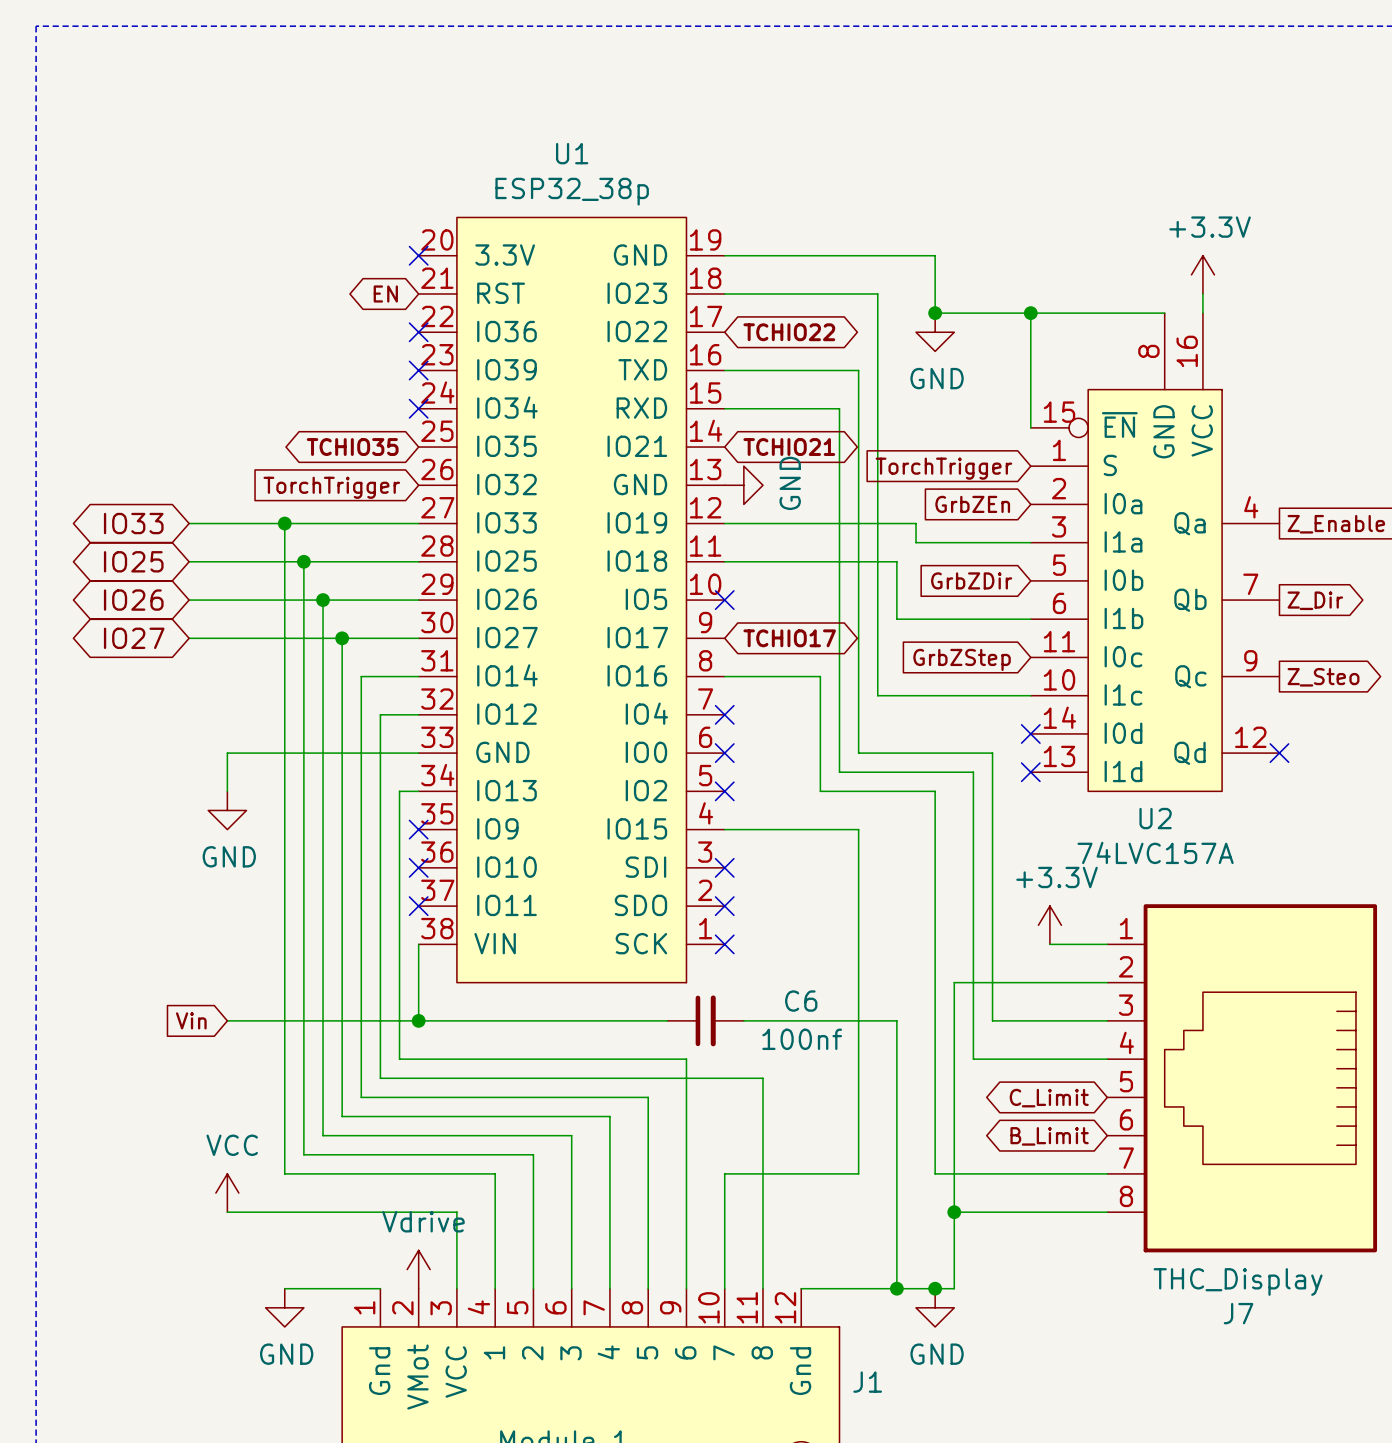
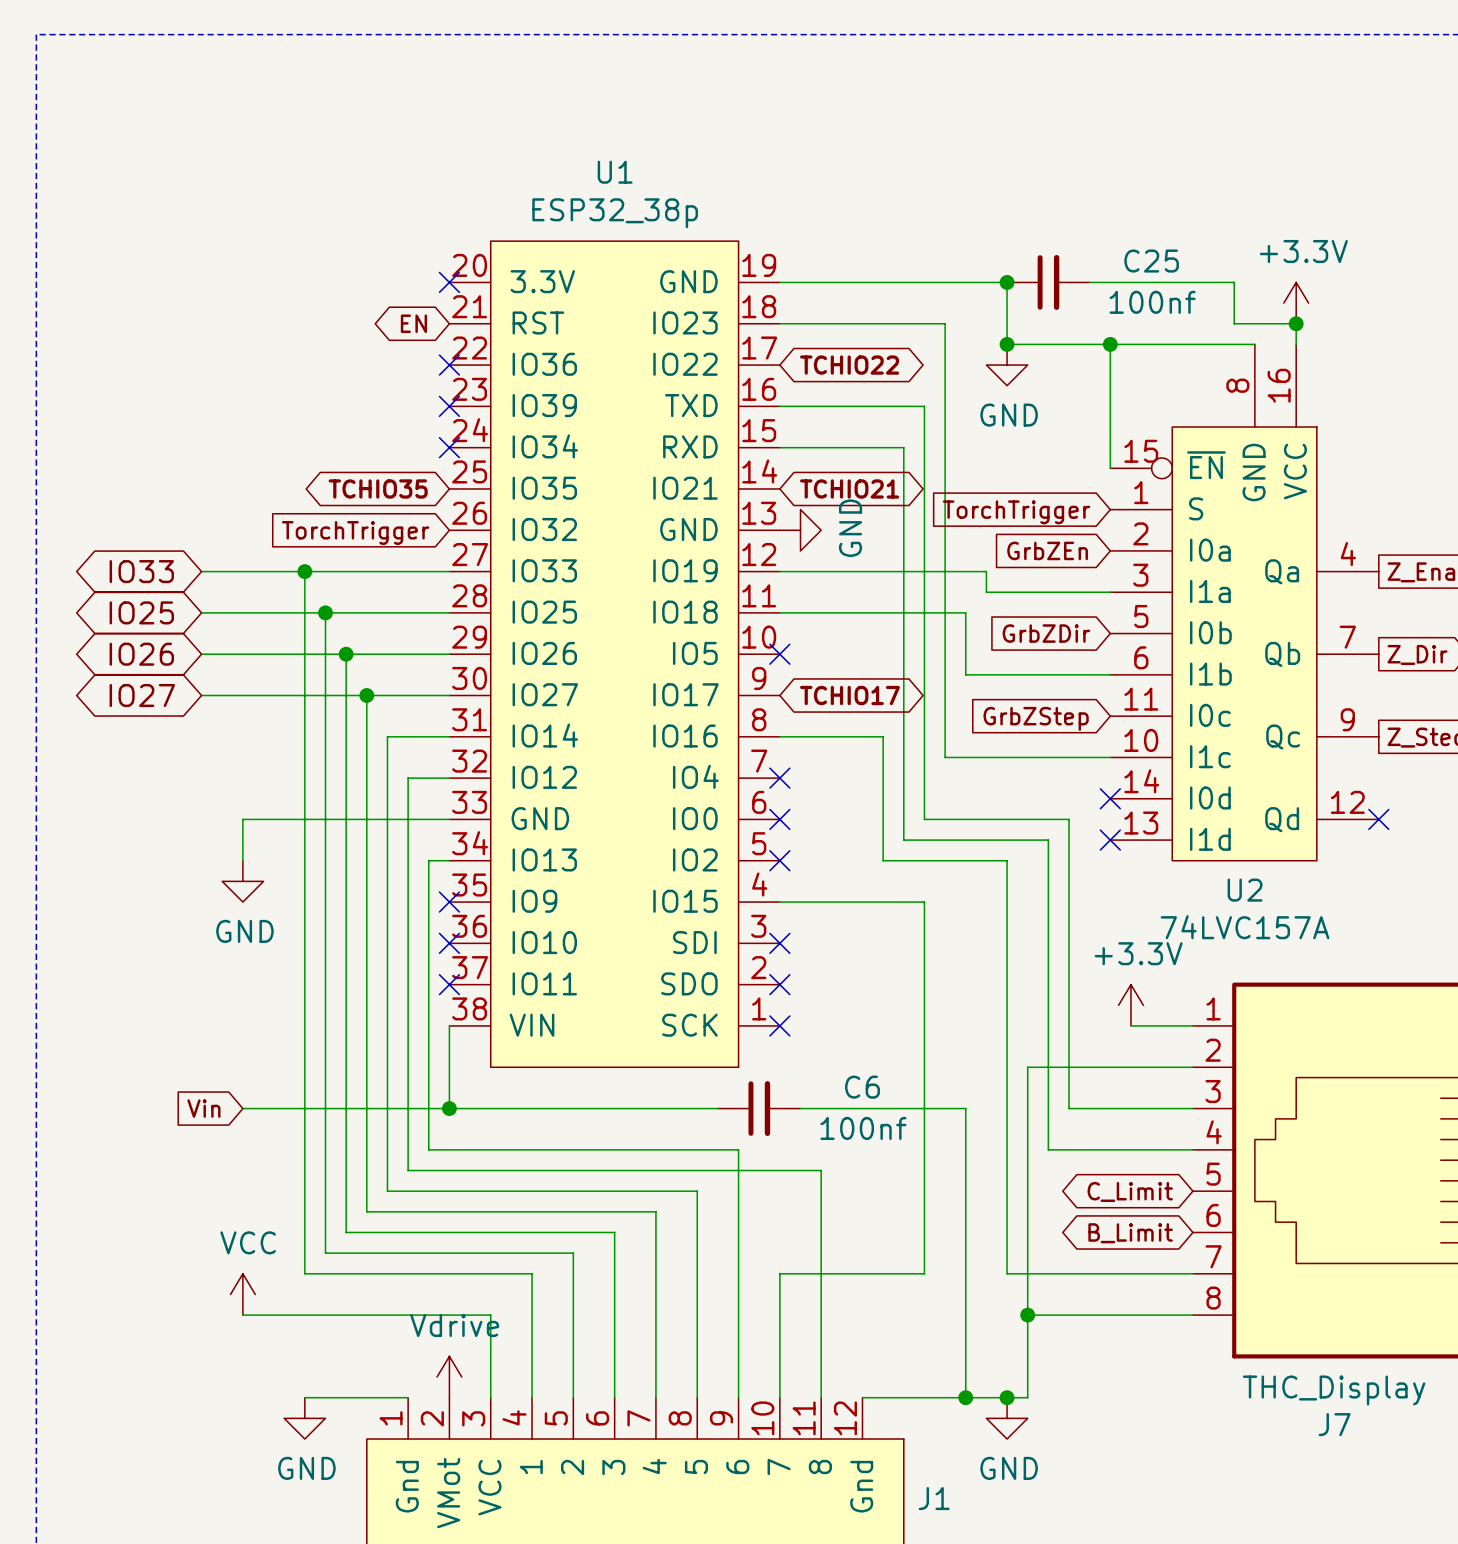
junction: none -> (1007, 282)
C25: none -> 100nf (1048, 282)
wire: none -> (1089, 282) (1234, 282) (1234, 323) (1296, 323)
junction: none -> (1296, 323)

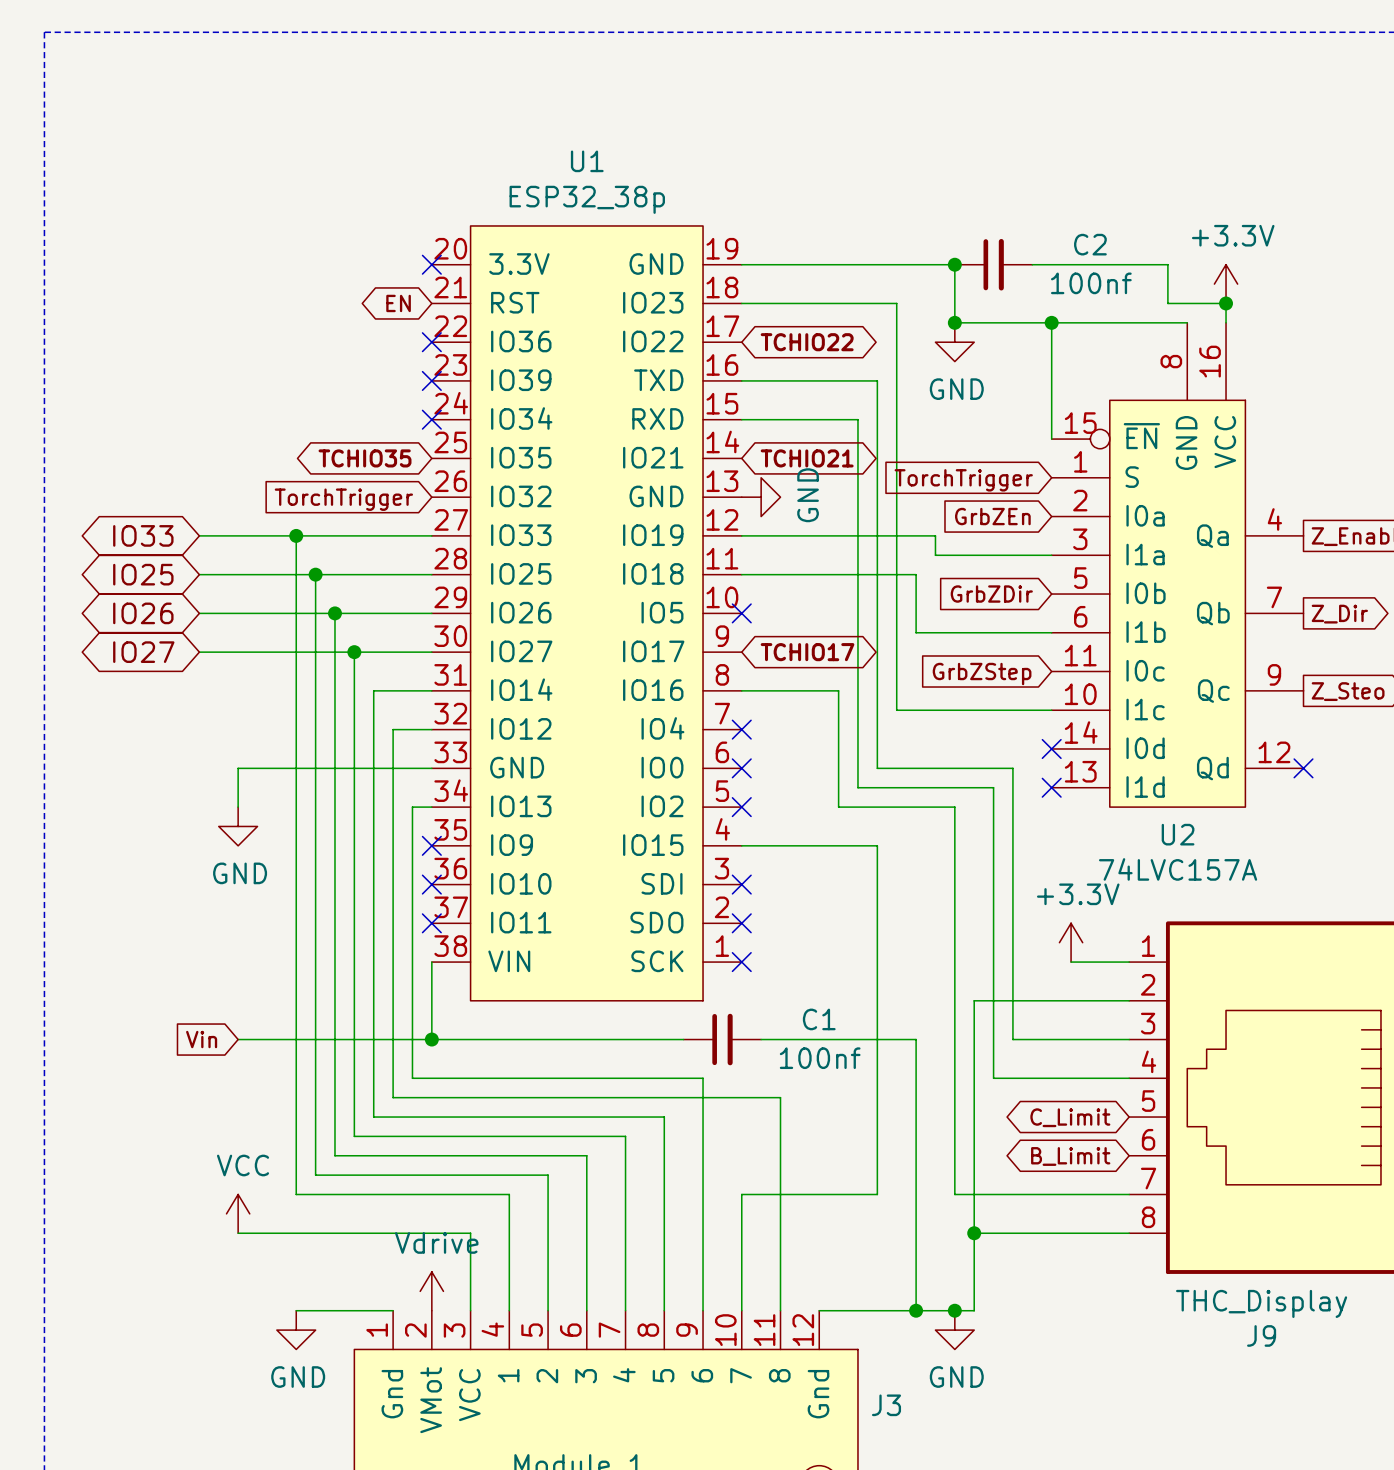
C25 name: C25 (1151, 261) -> C2 (1090, 244)
C6 name: C6 (862, 1087) -> C1 (819, 1019)
J7 name: J7 (1334, 1424) -> J9 (1261, 1335)
J1 name: J1 (934, 1498) -> J3 (886, 1405)

